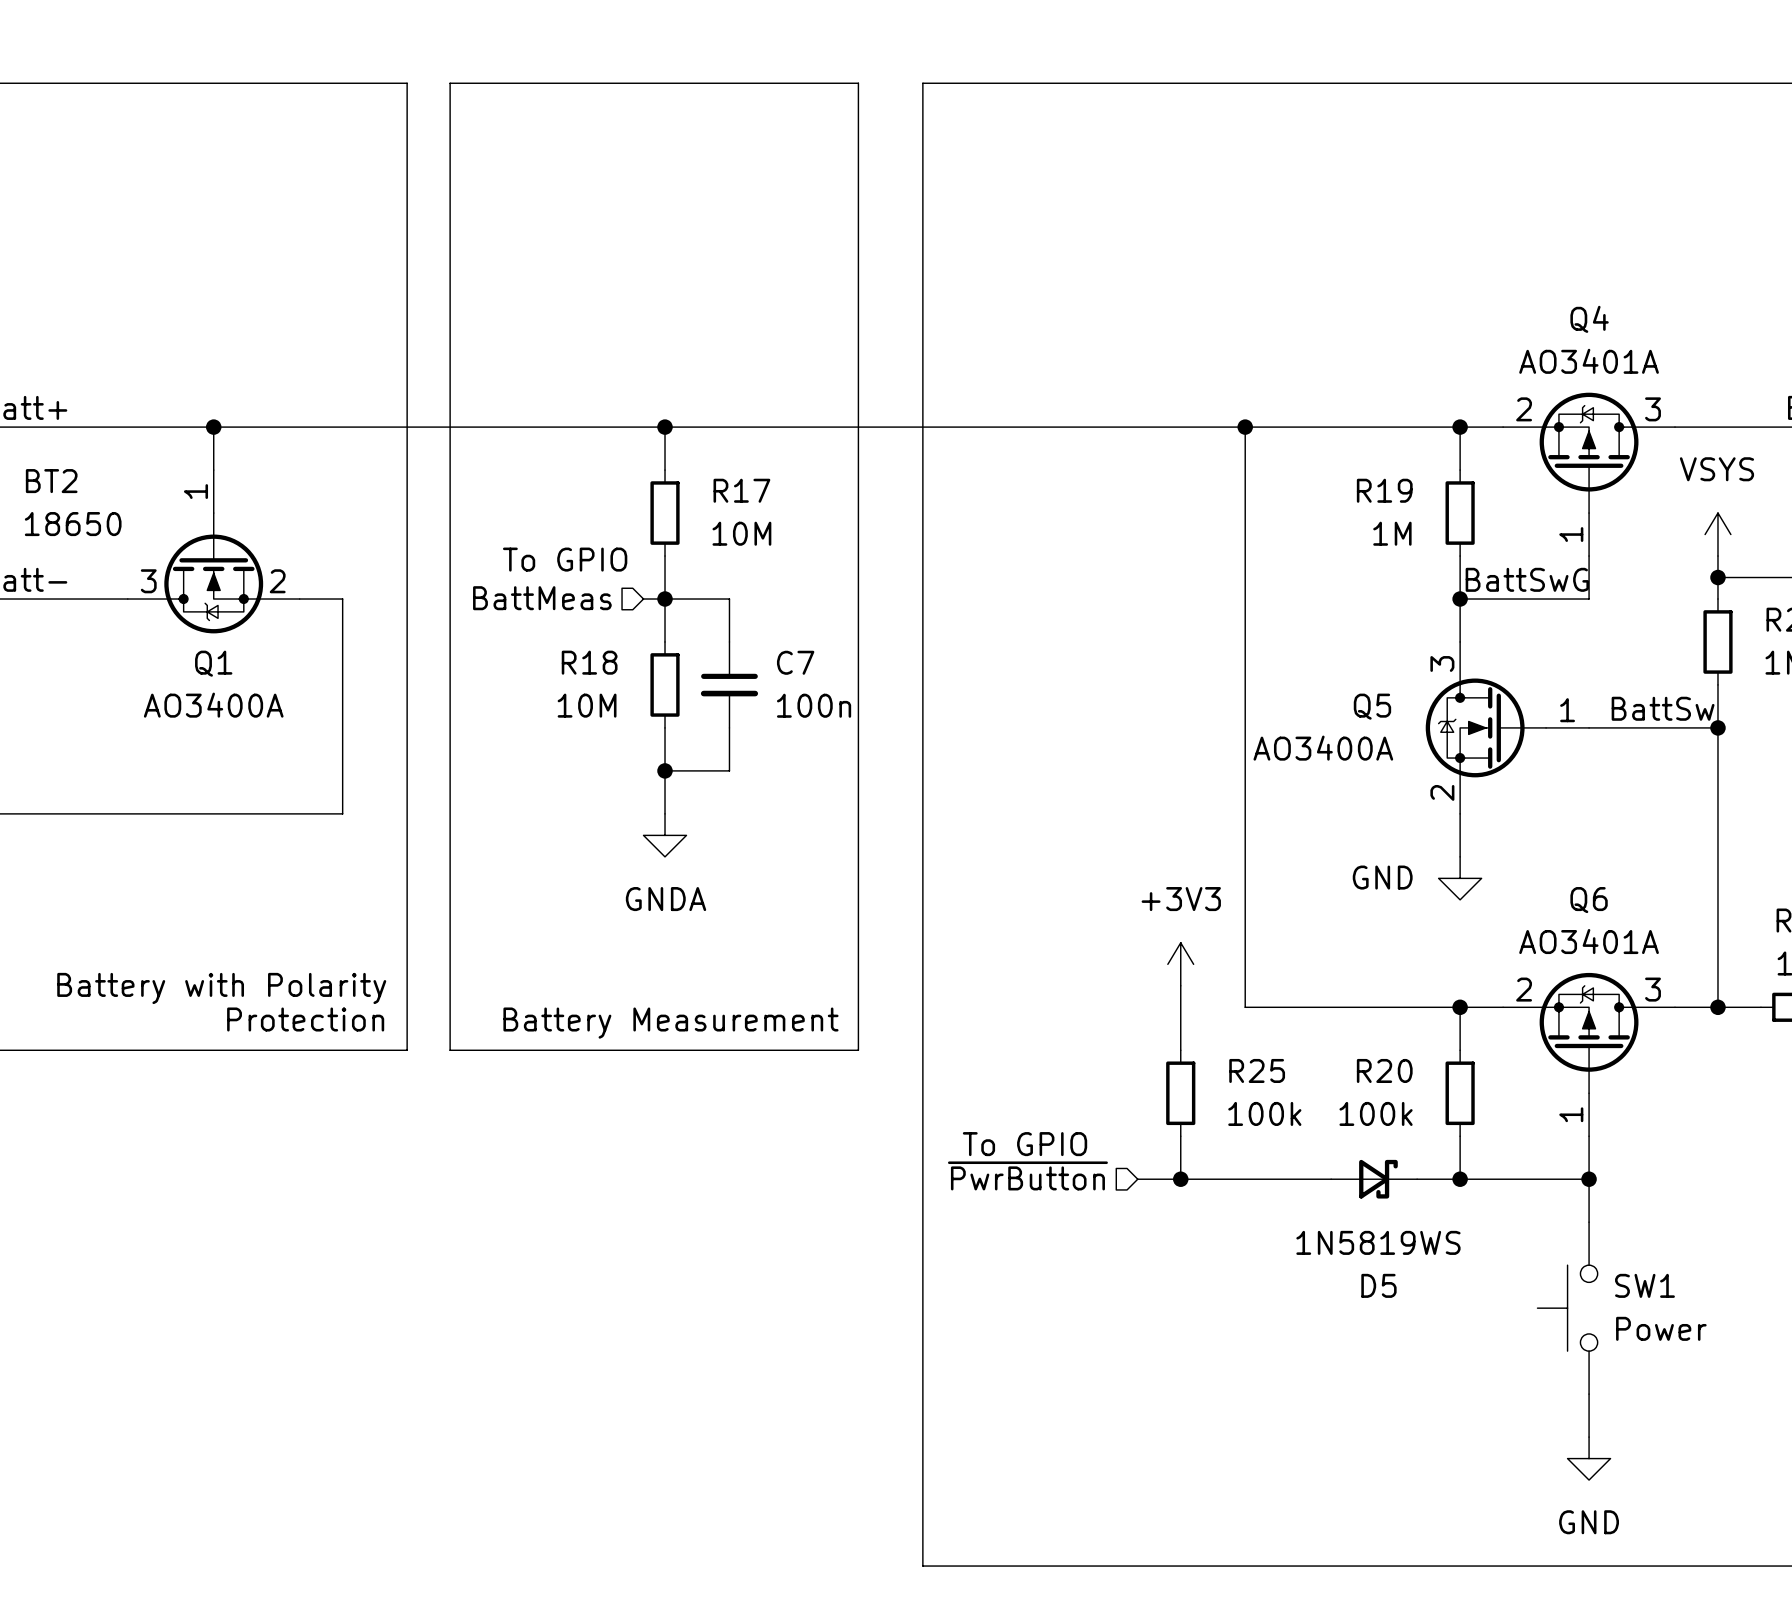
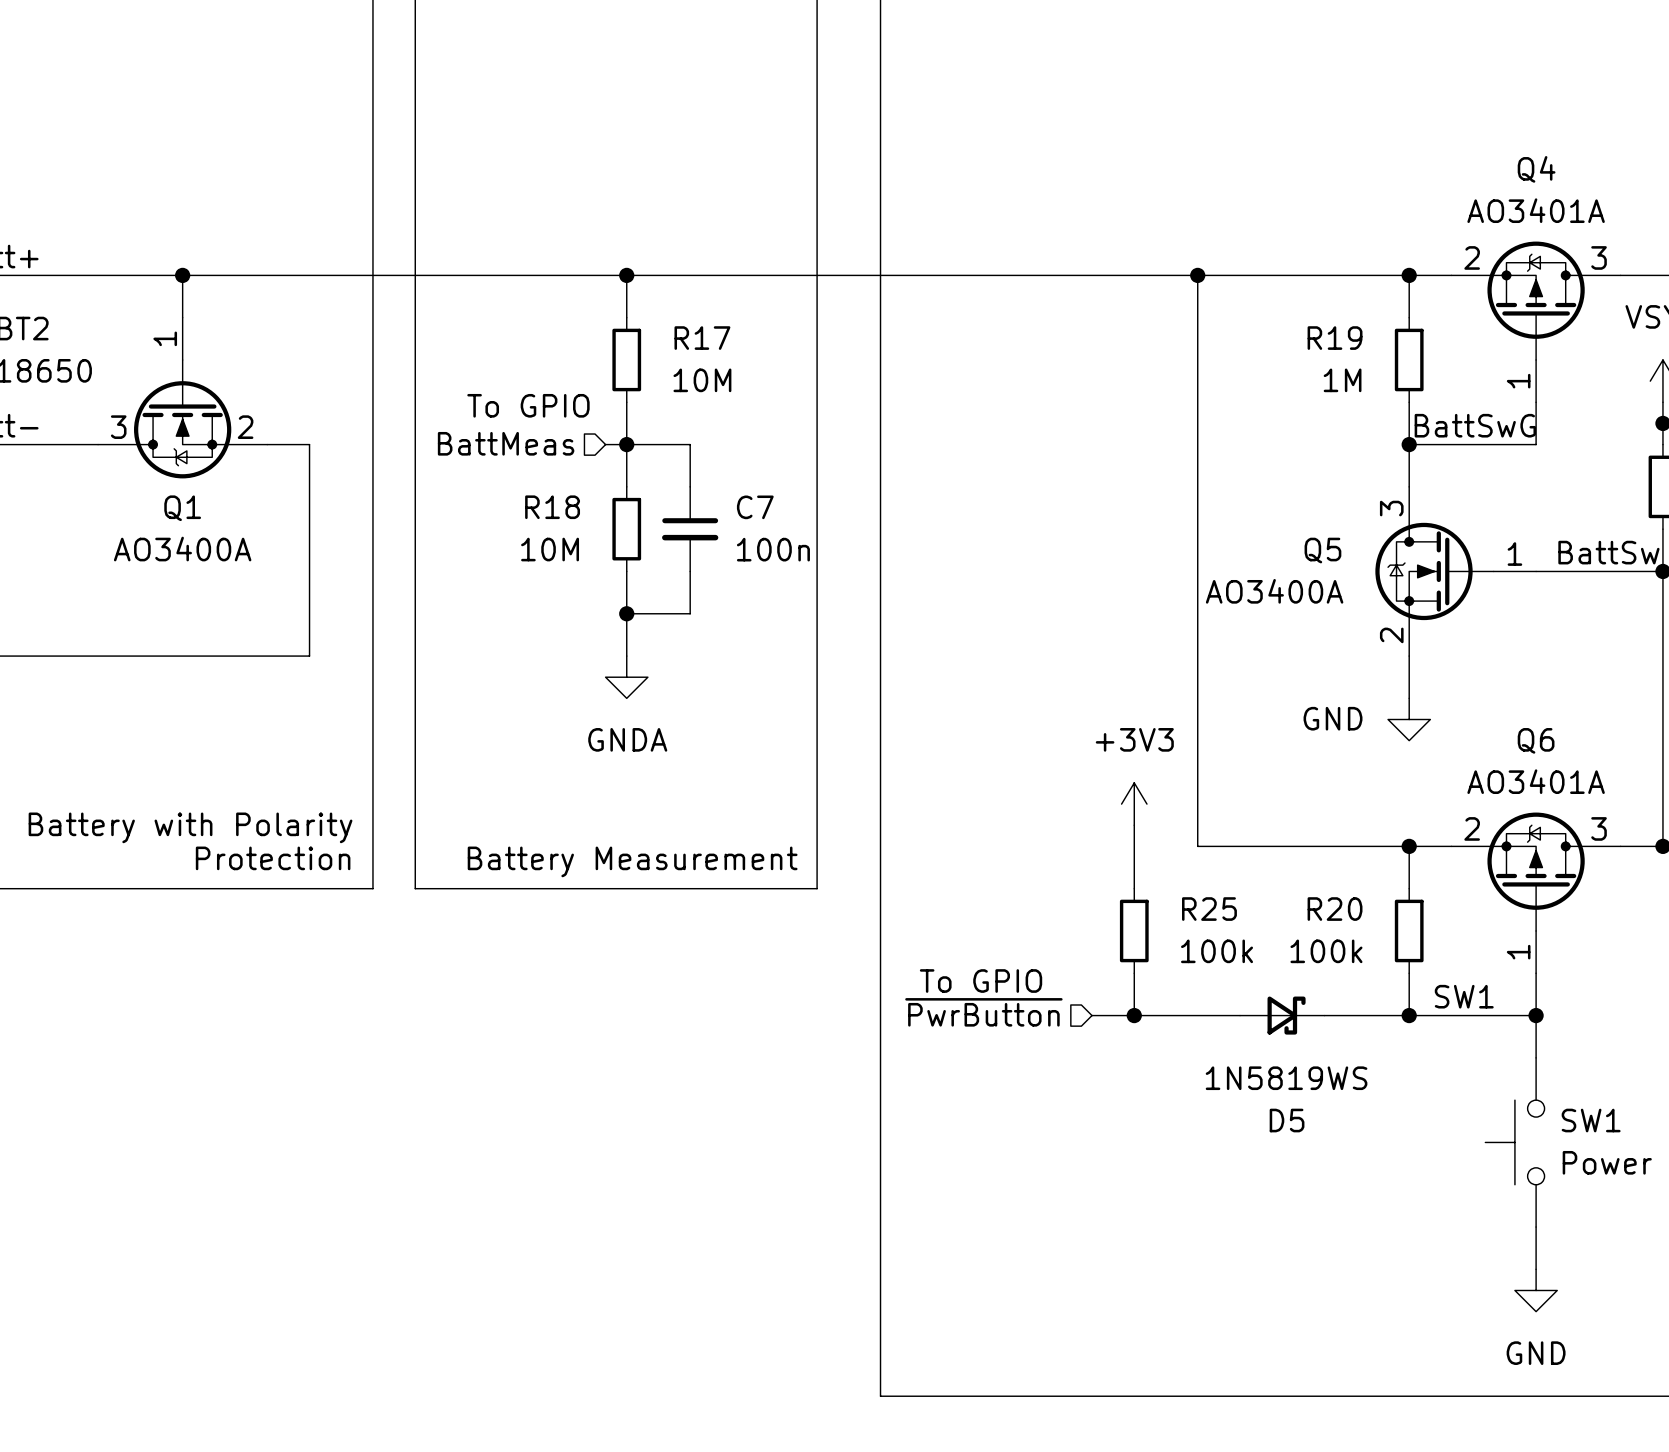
label: none -> SW1 (1464, 996)
D5 position: (1374, 1179) -> (1282, 1015)

